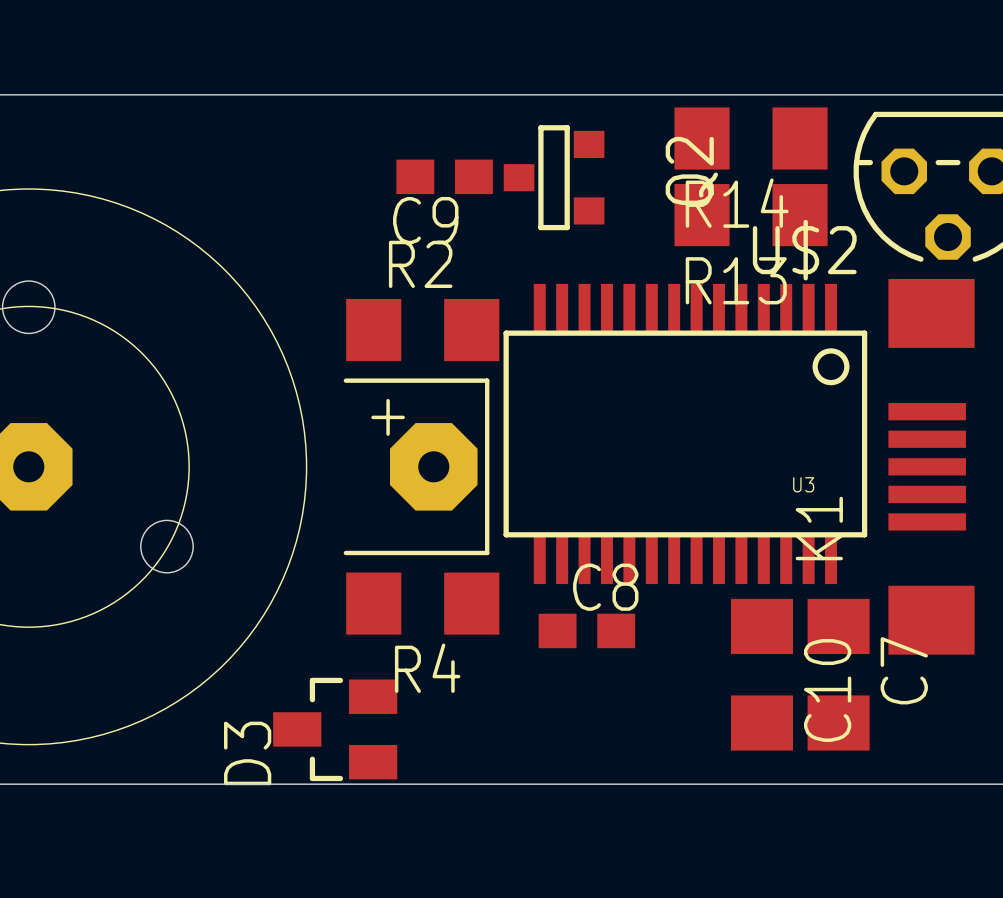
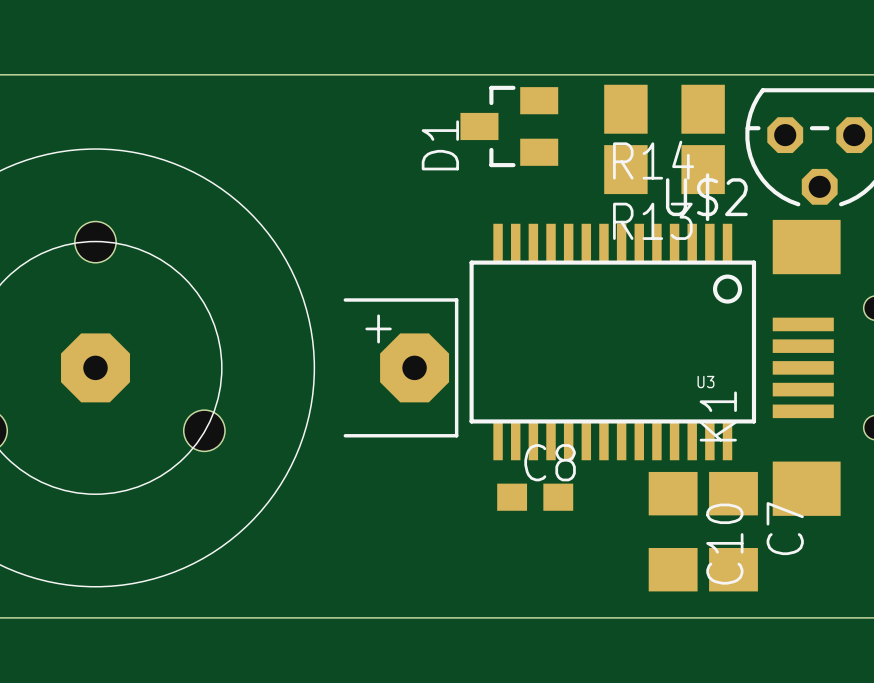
D1: none -> (509, 126)
C9: (444, 176) -> none
Q2: (554, 177) -> none
R2: (422, 330) -> none
R4: (422, 603) -> none
D3: (335, 729) -> none

